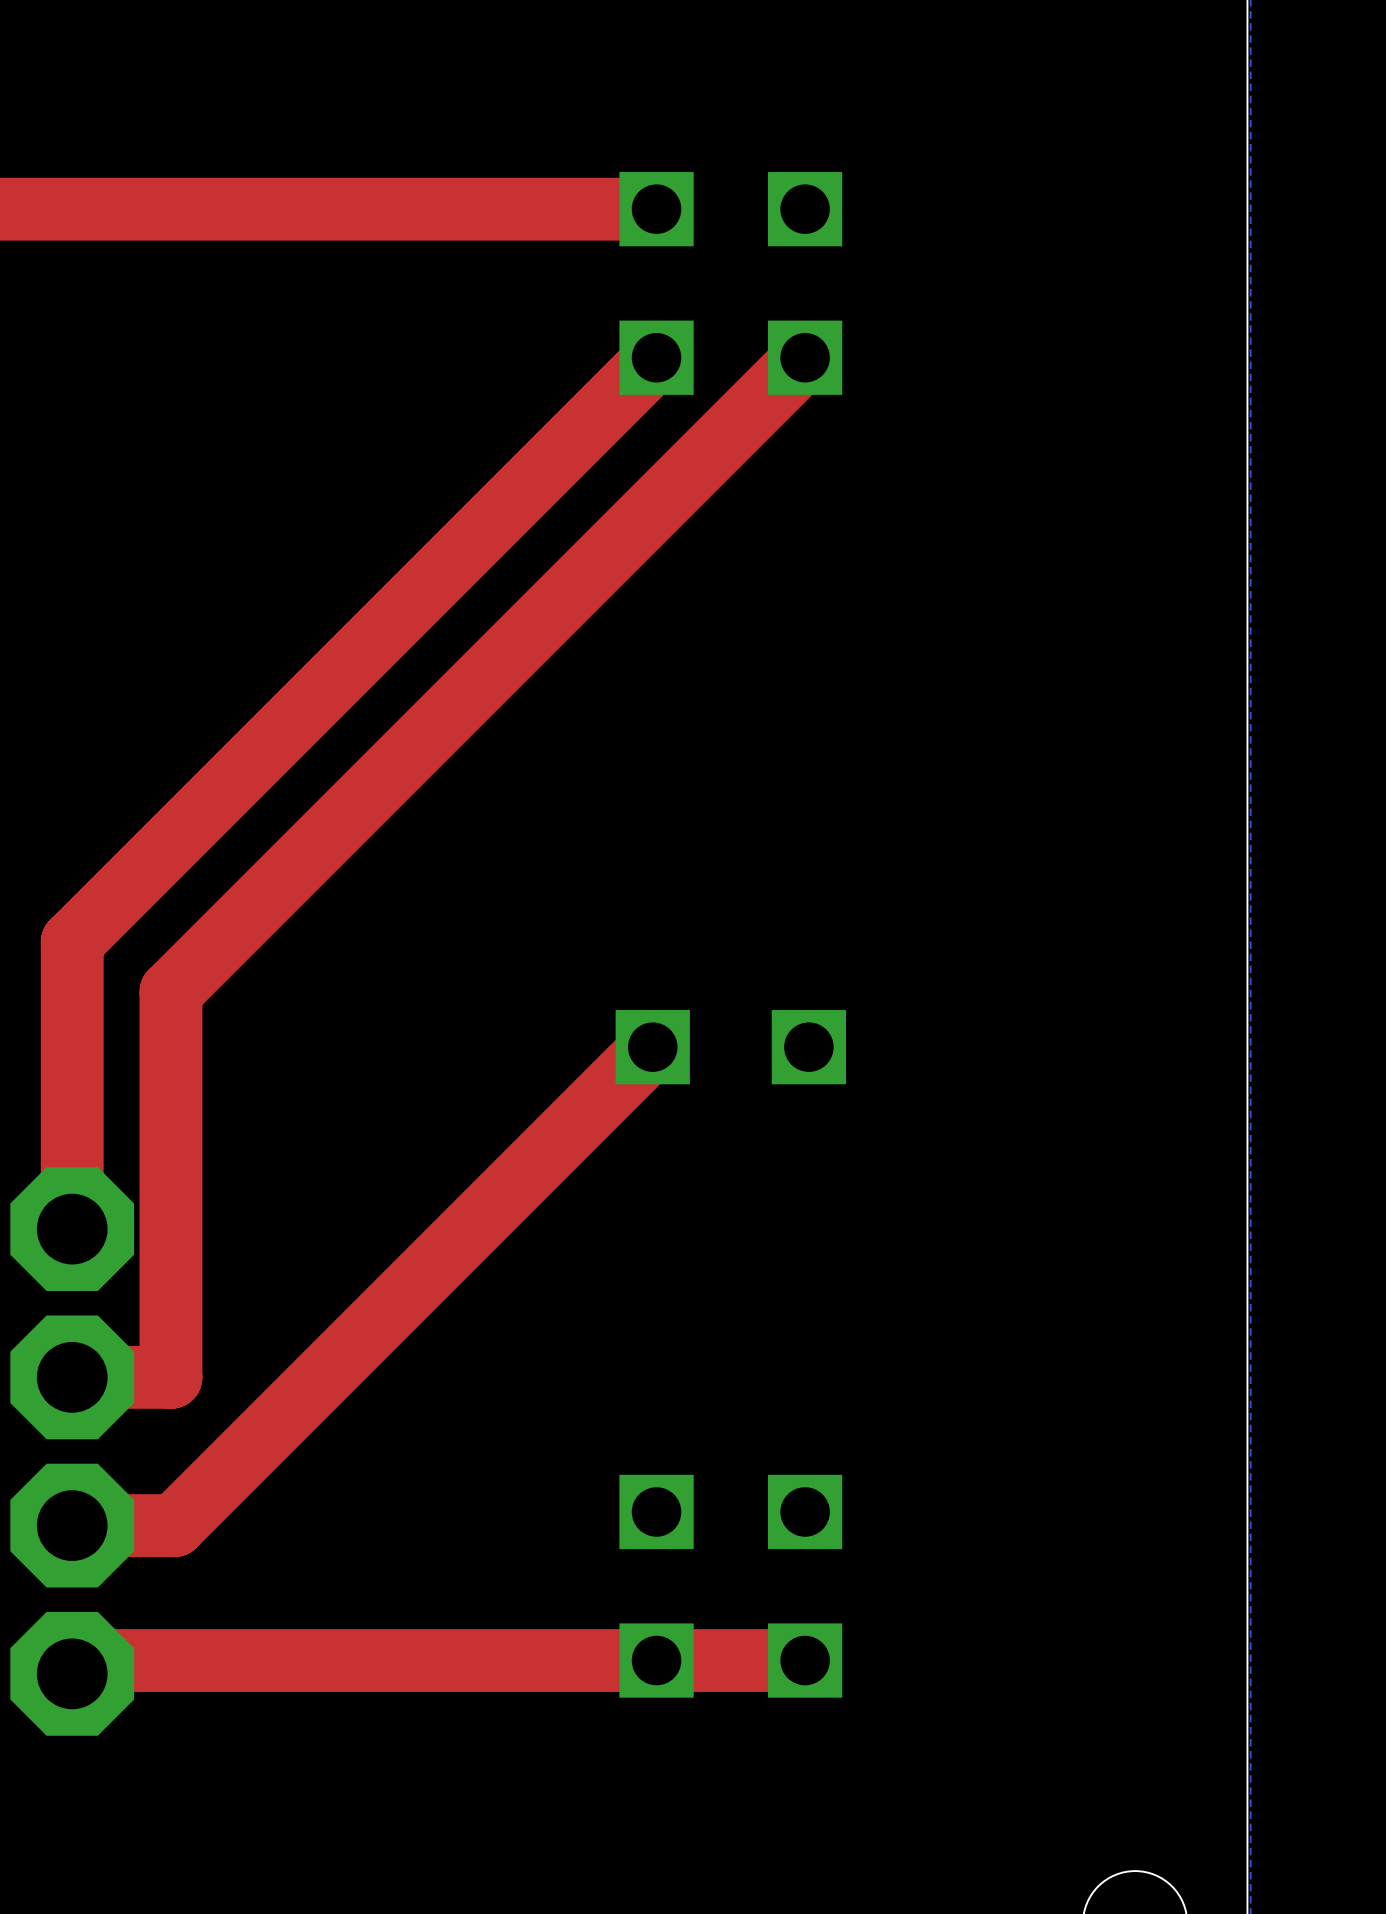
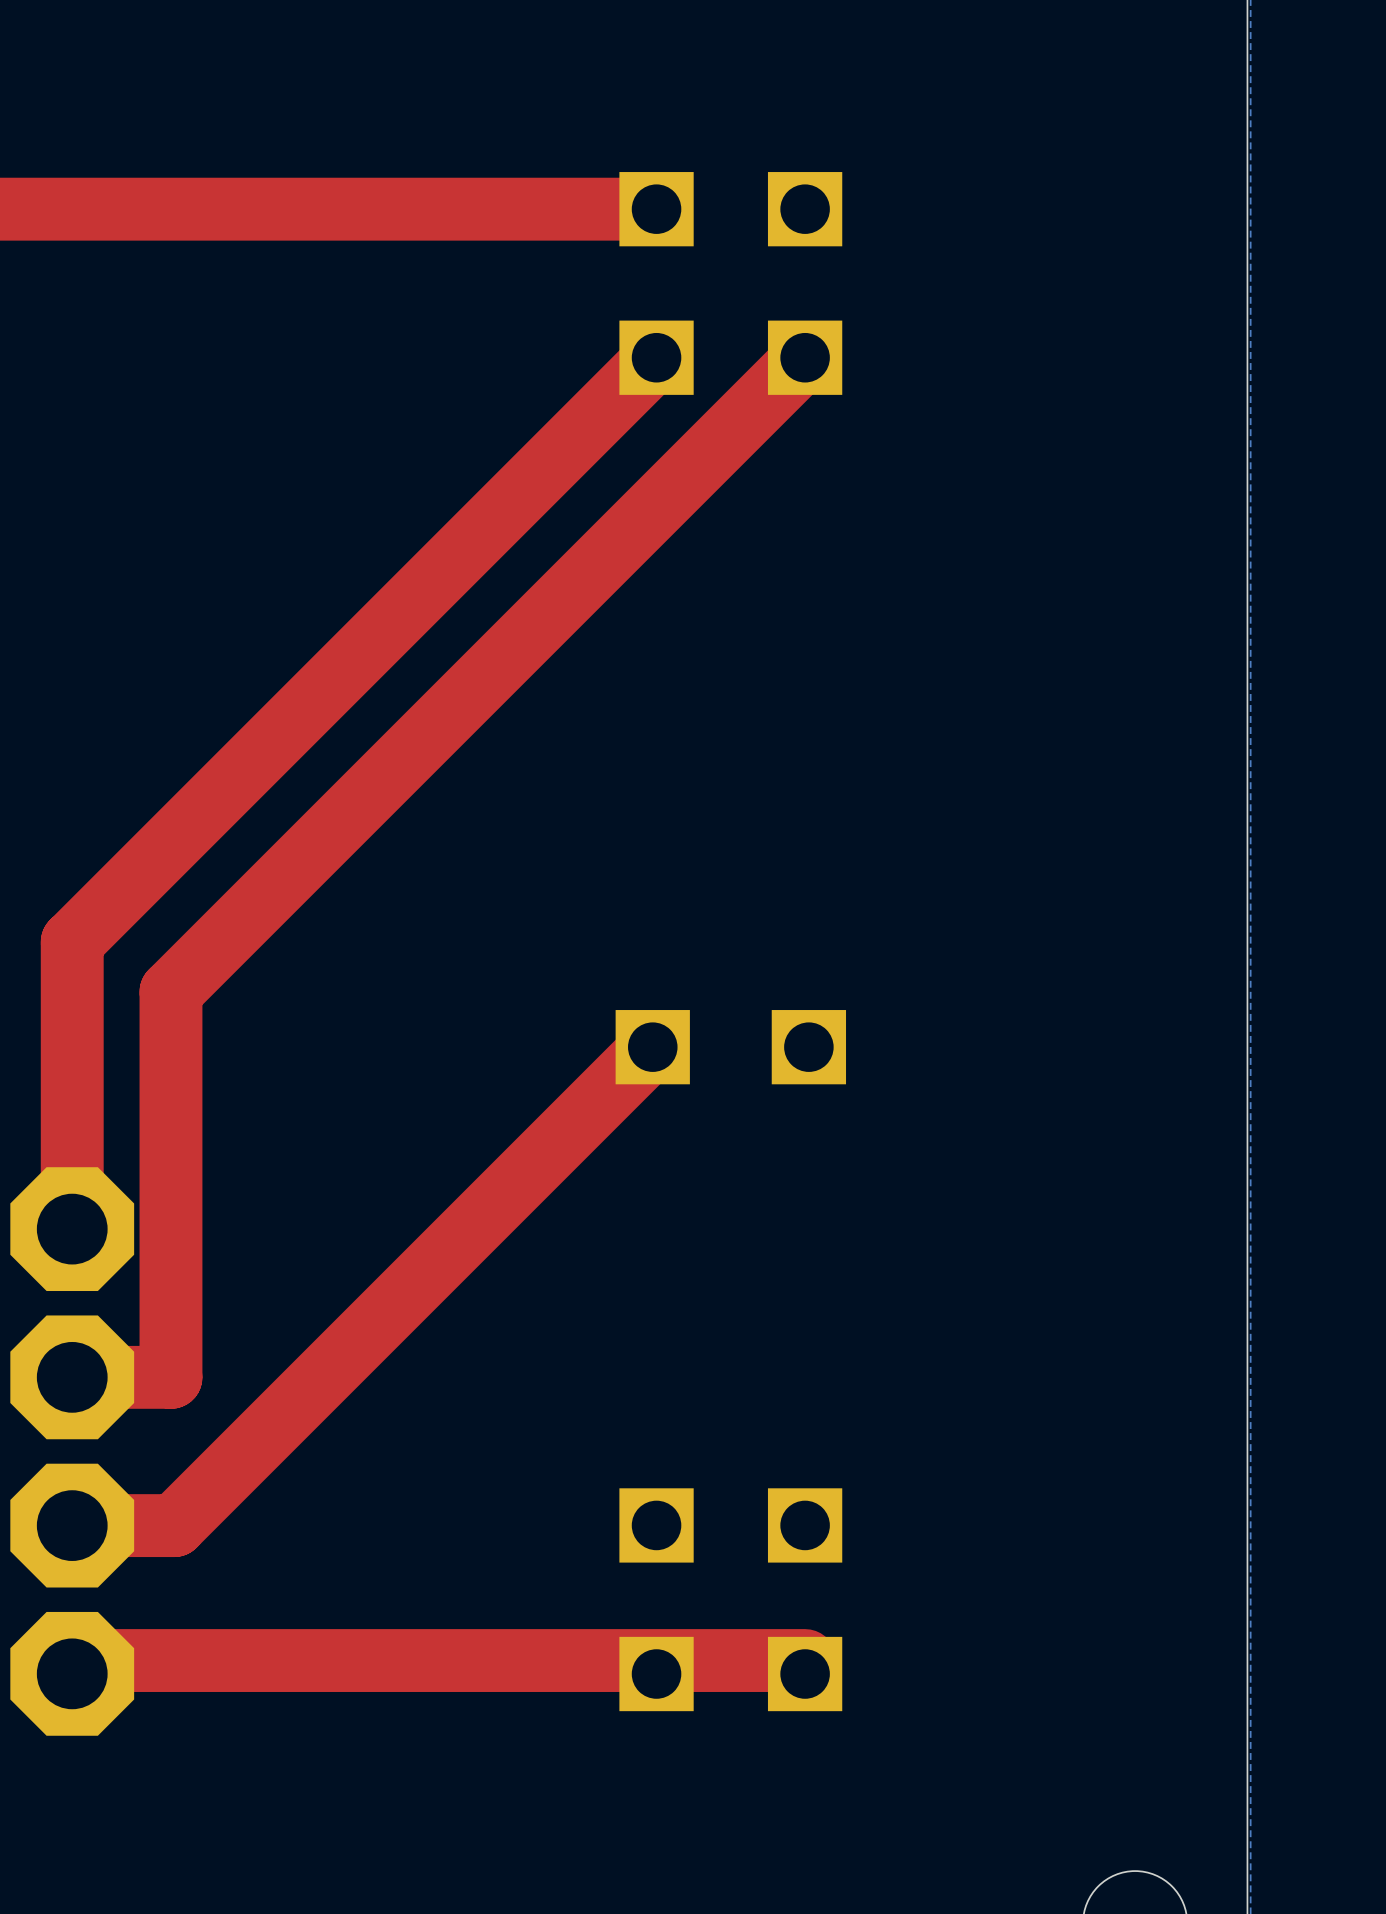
part position: (730, 1586) -> (730, 1599)

